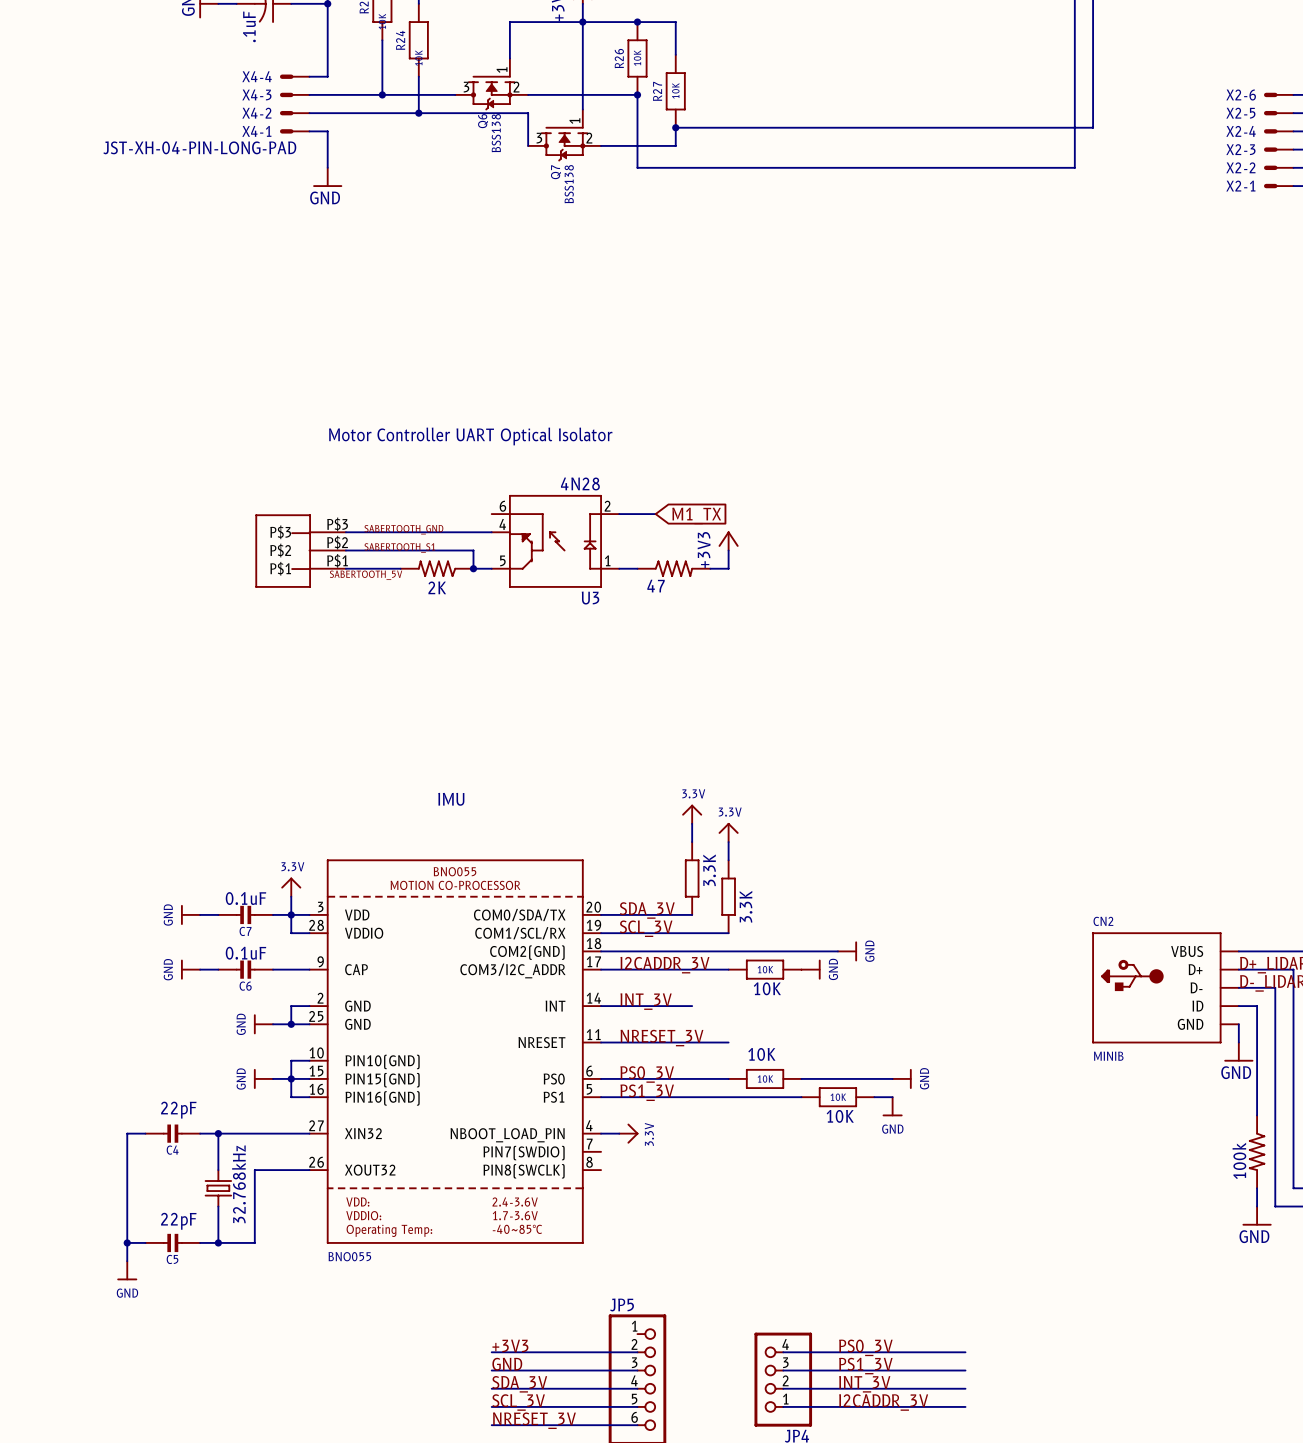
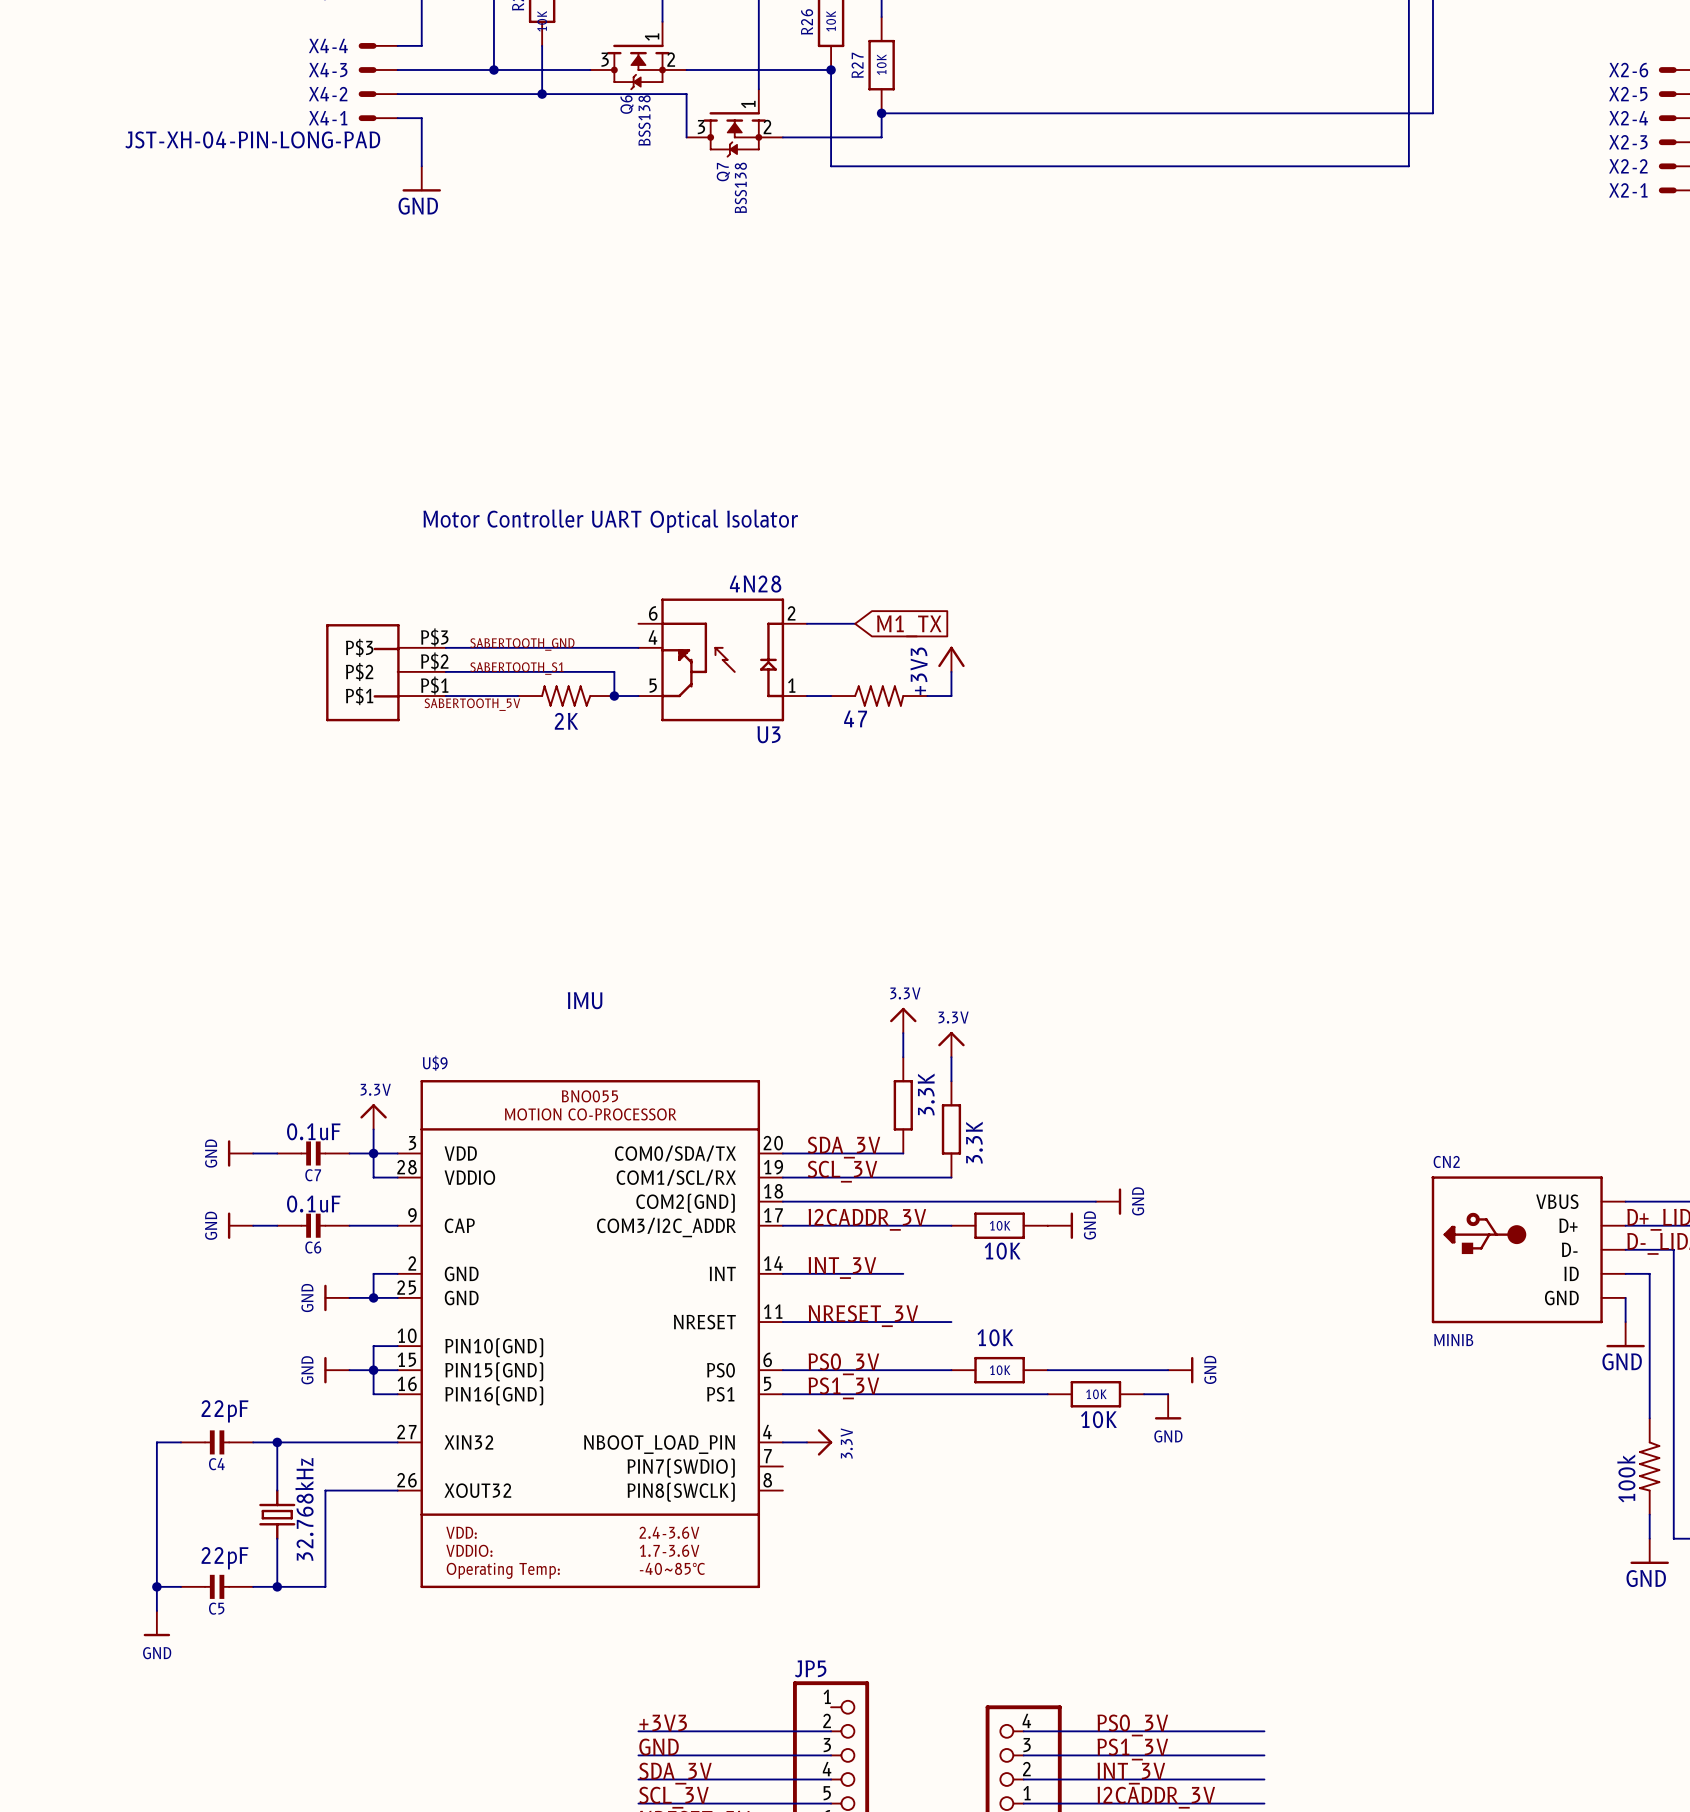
part: BNO055 (455, 1051) -> none
U$9: none -> (590, 1334)

